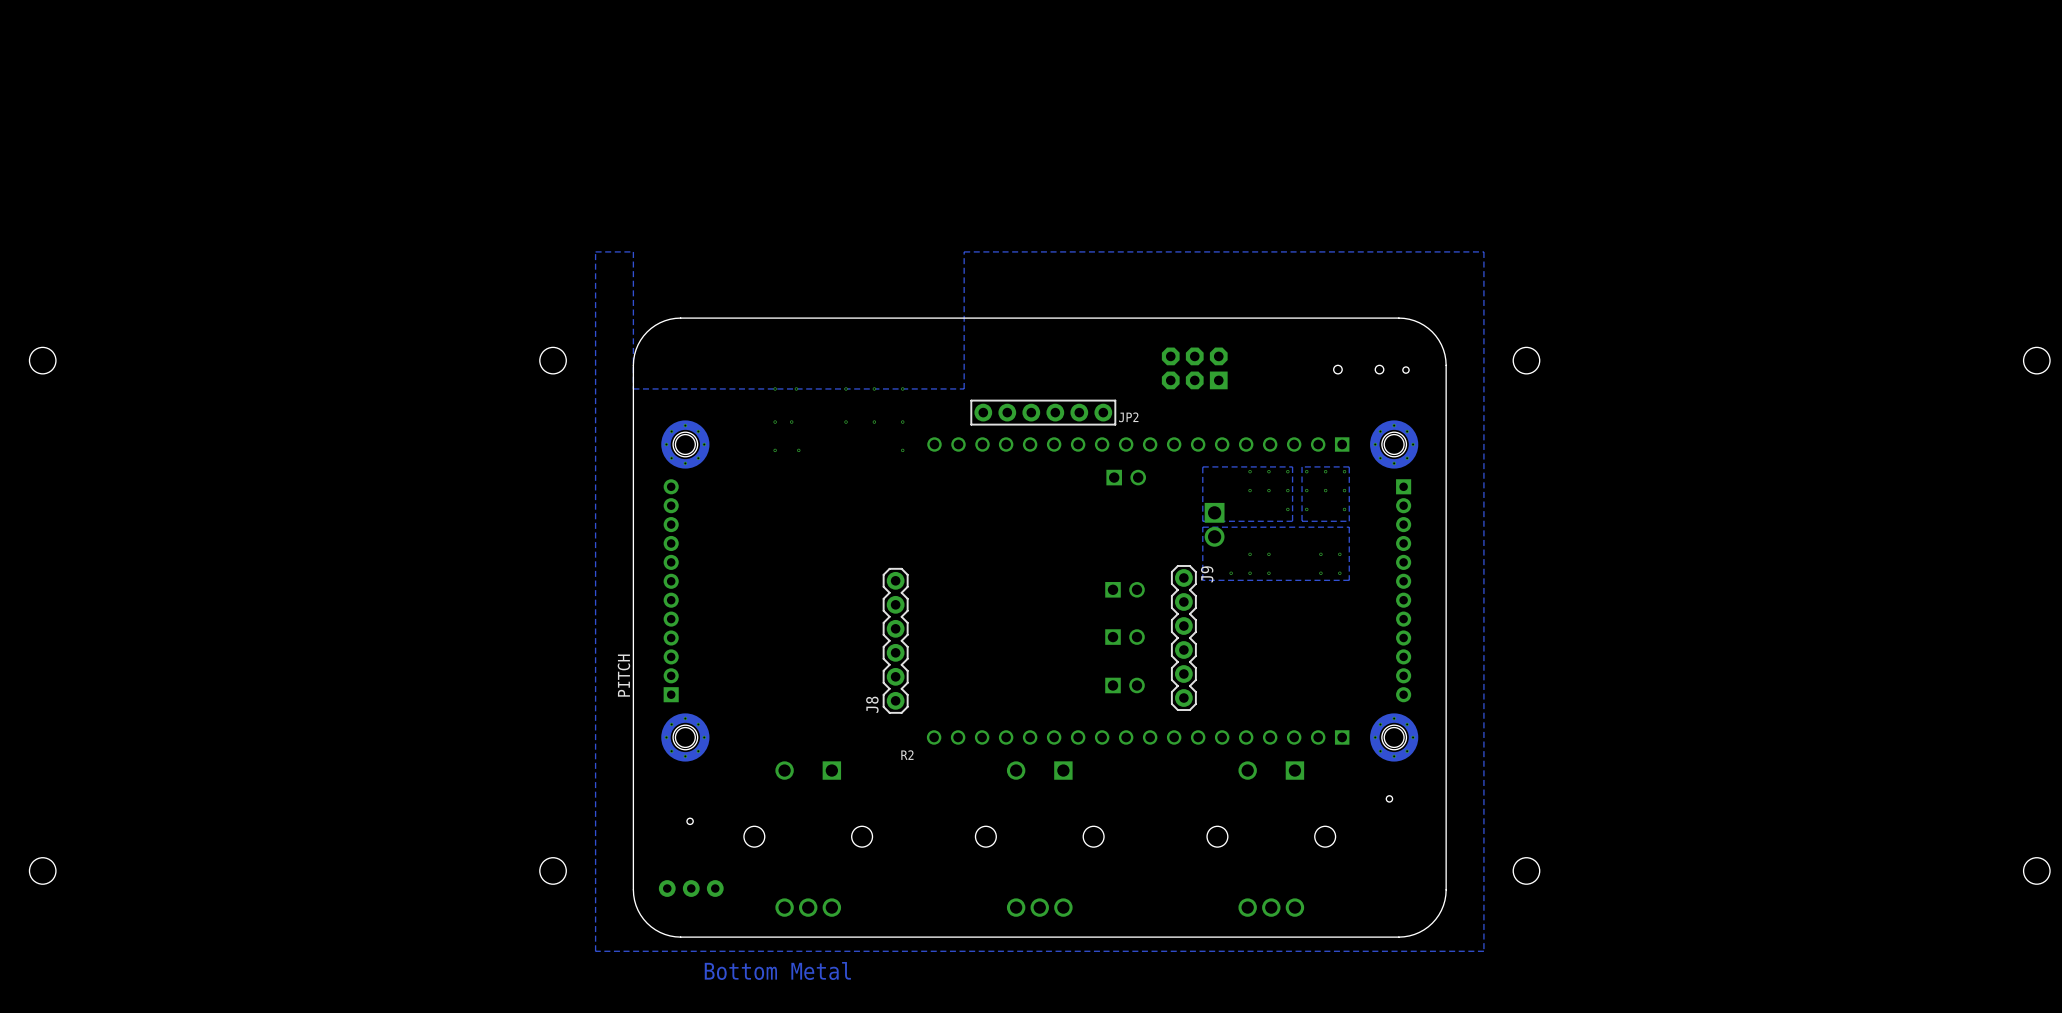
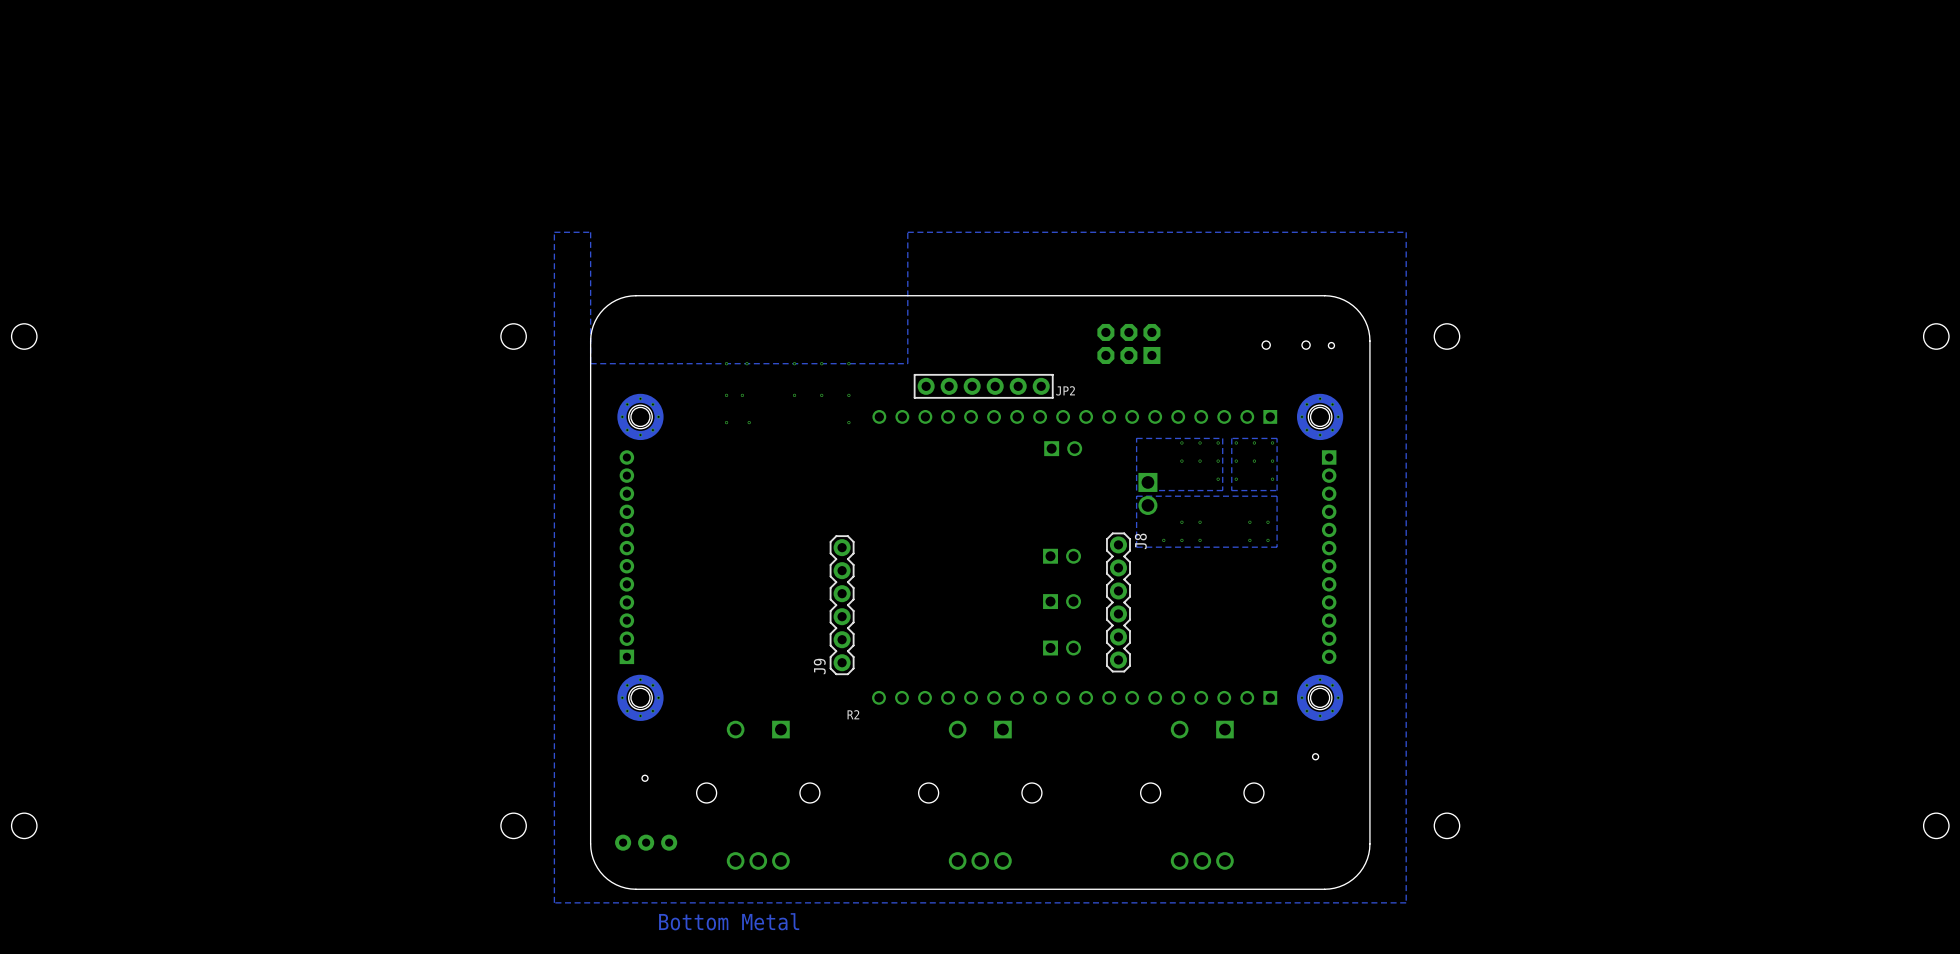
J9 name: J9 (1207, 574) -> J8 (1140, 541)
part text: PITCH (623, 675) -> none
J8 name: J8 (872, 704) -> J9 (819, 666)

